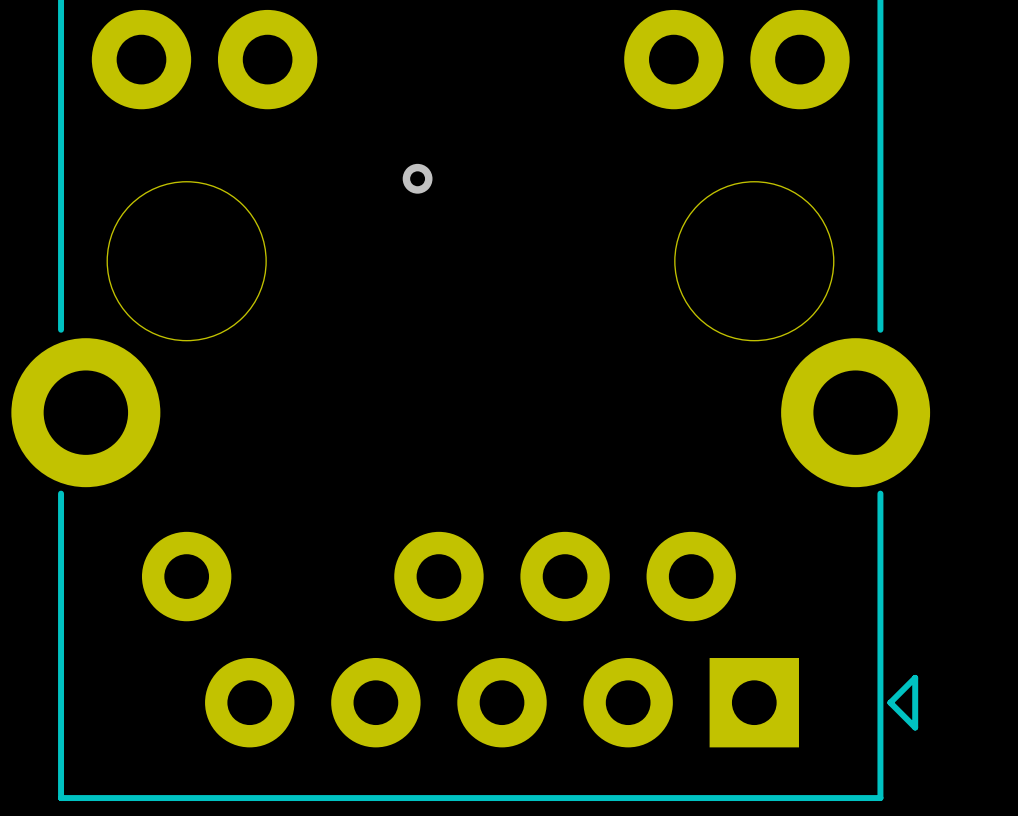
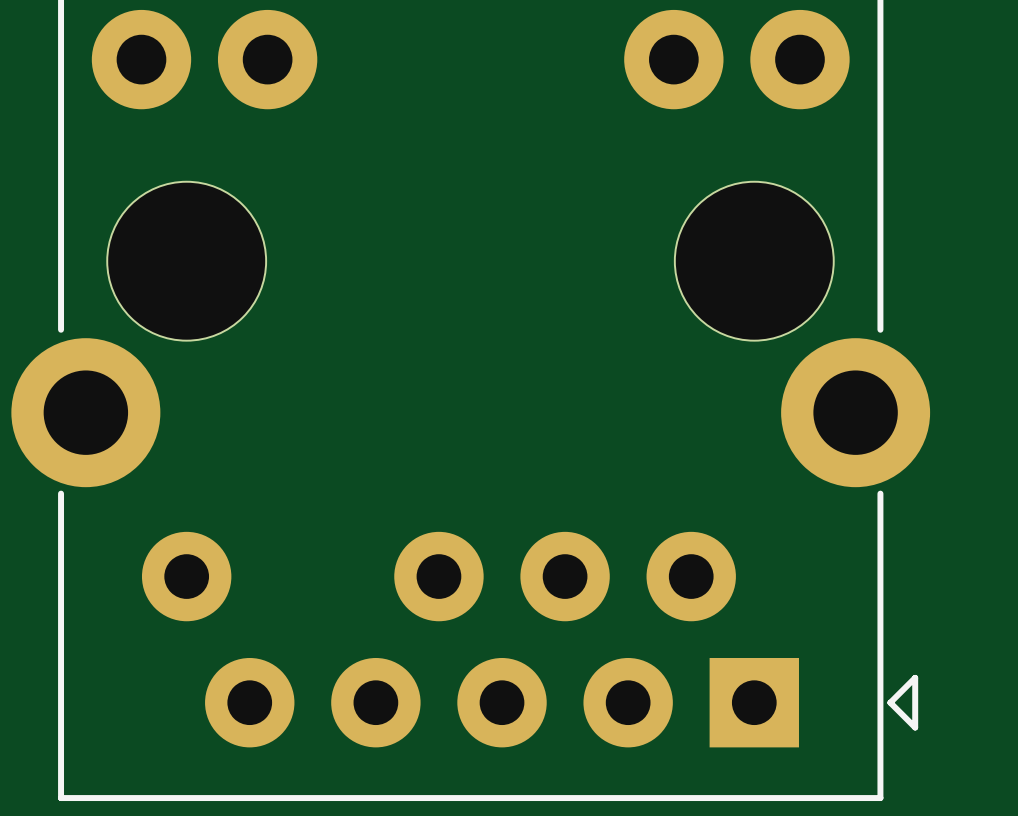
via: (417, 178) -> none

